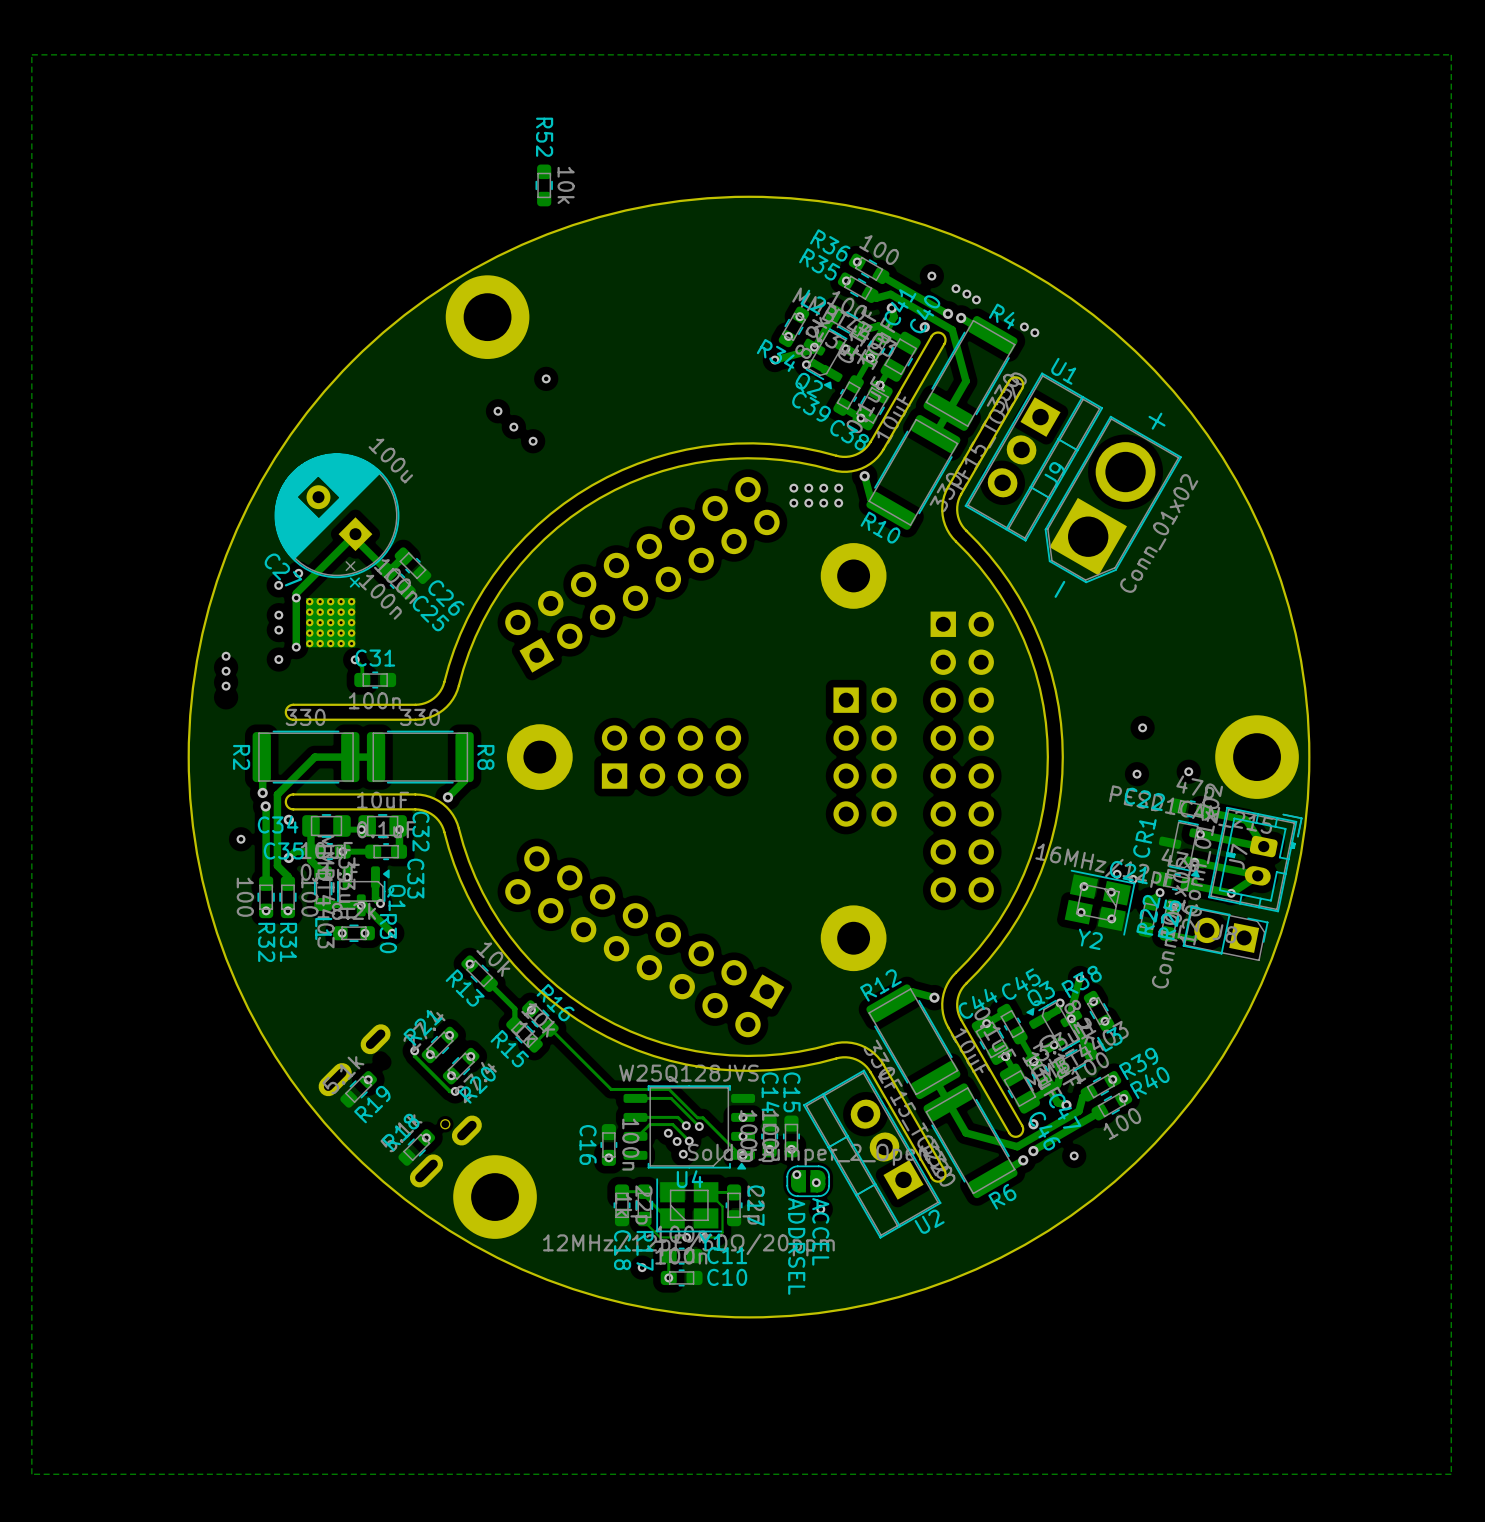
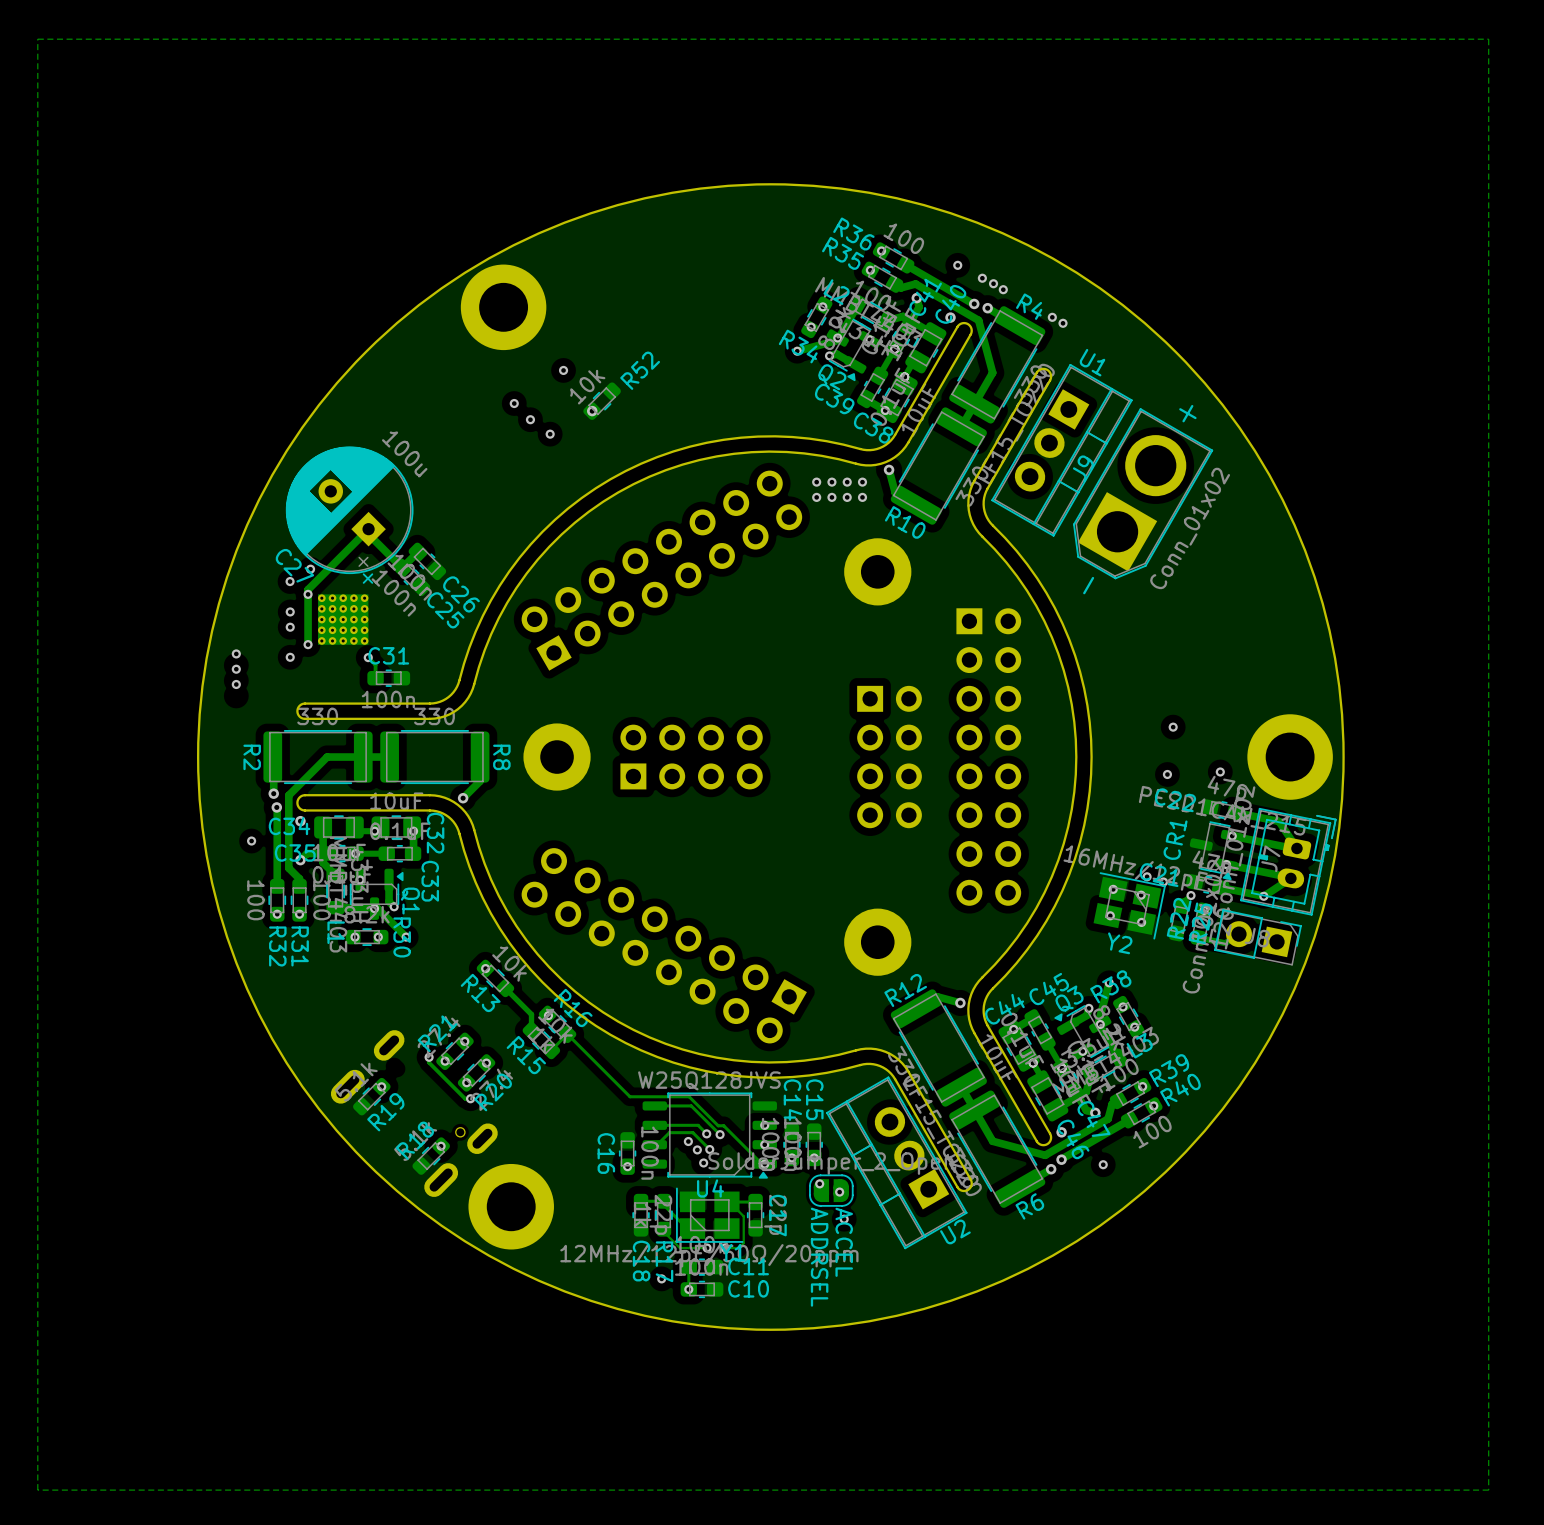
R52 rotation: 0° (544, 185) -> 45° clockwise (602, 401)
R52 position: (544, 185) -> (602, 401)
R52 value position: 10k (566, 185) -> 10k (587, 387)
via: none -> (592, 411)

